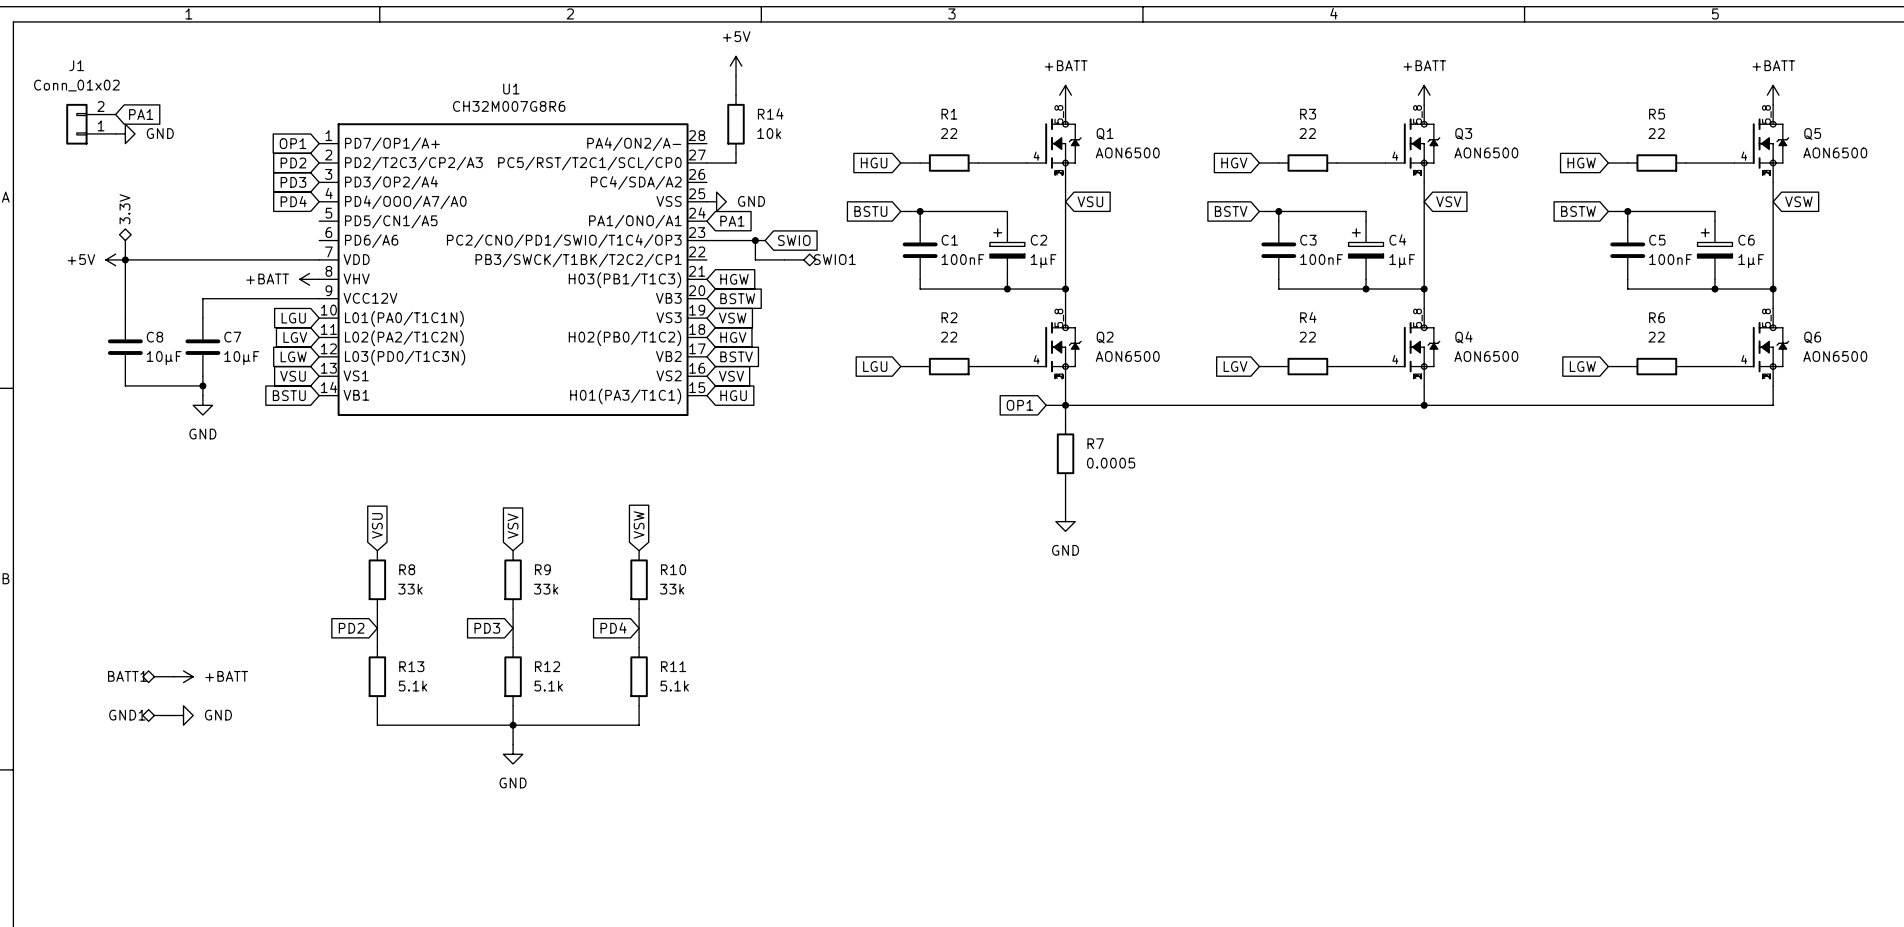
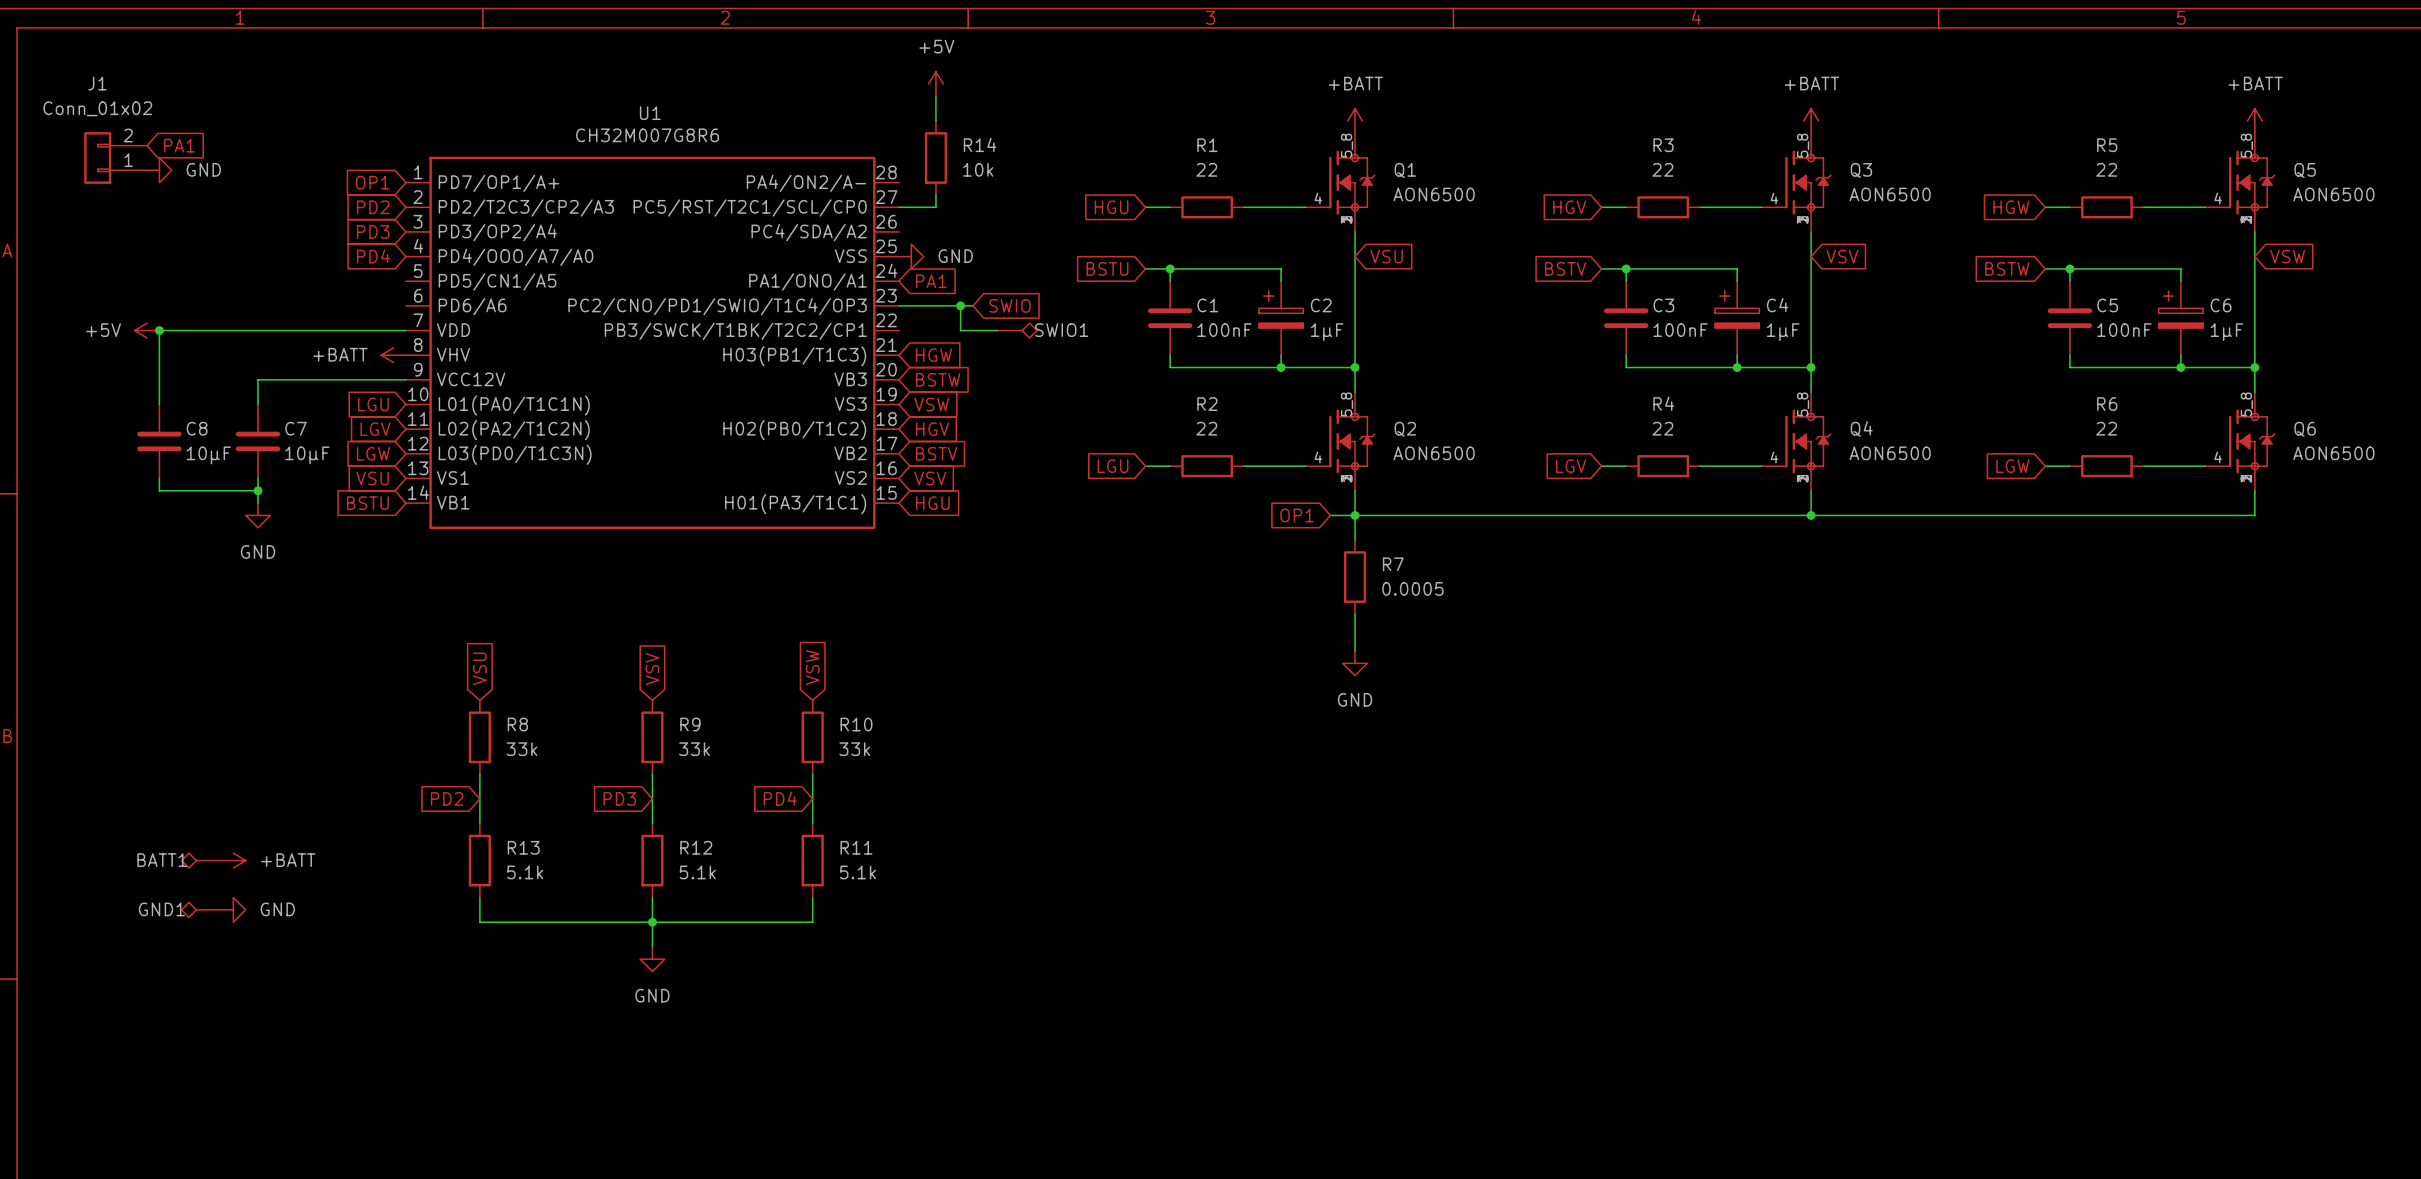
3.3V: (125, 244) -> none

